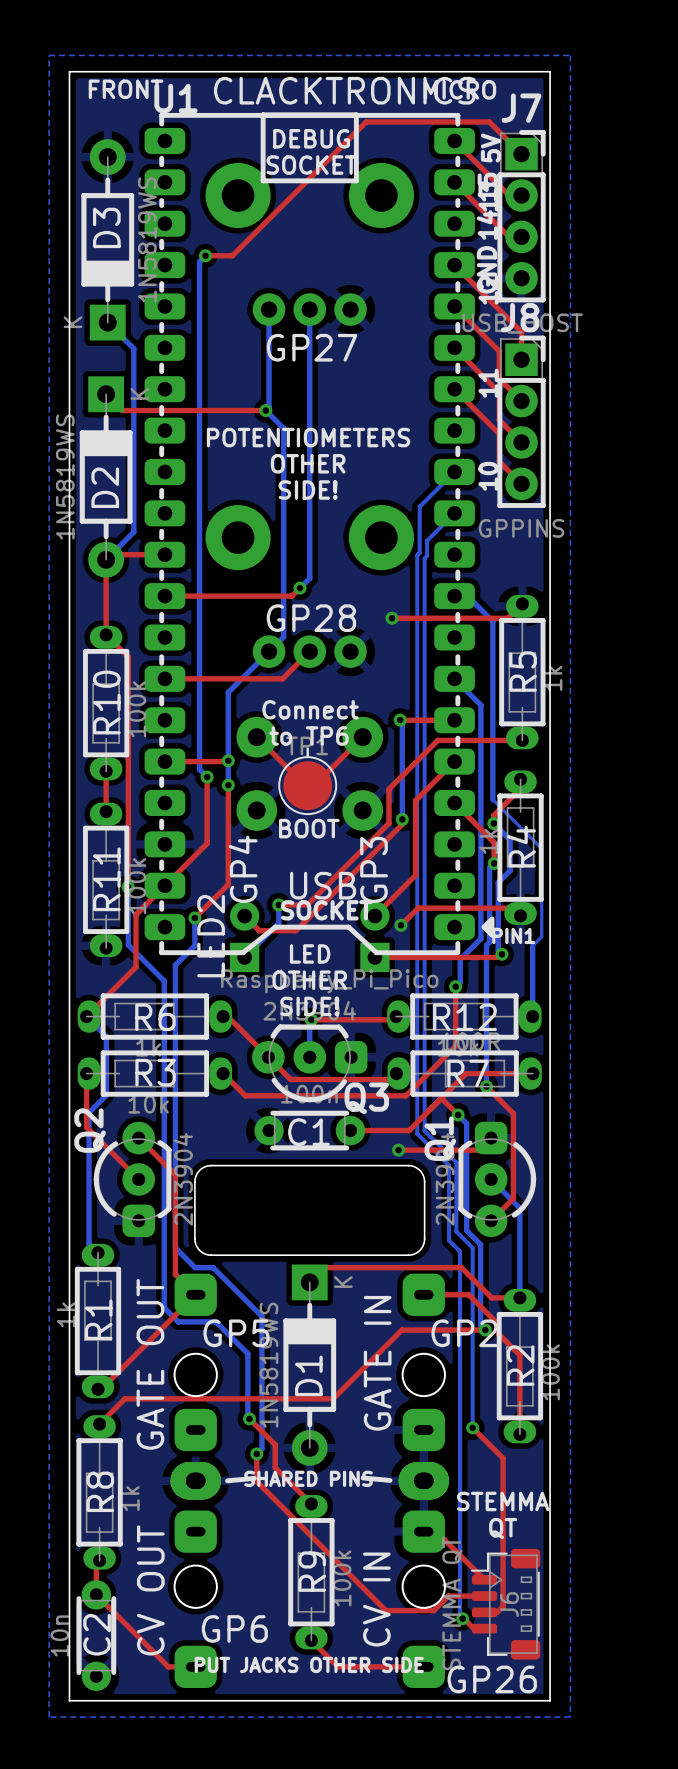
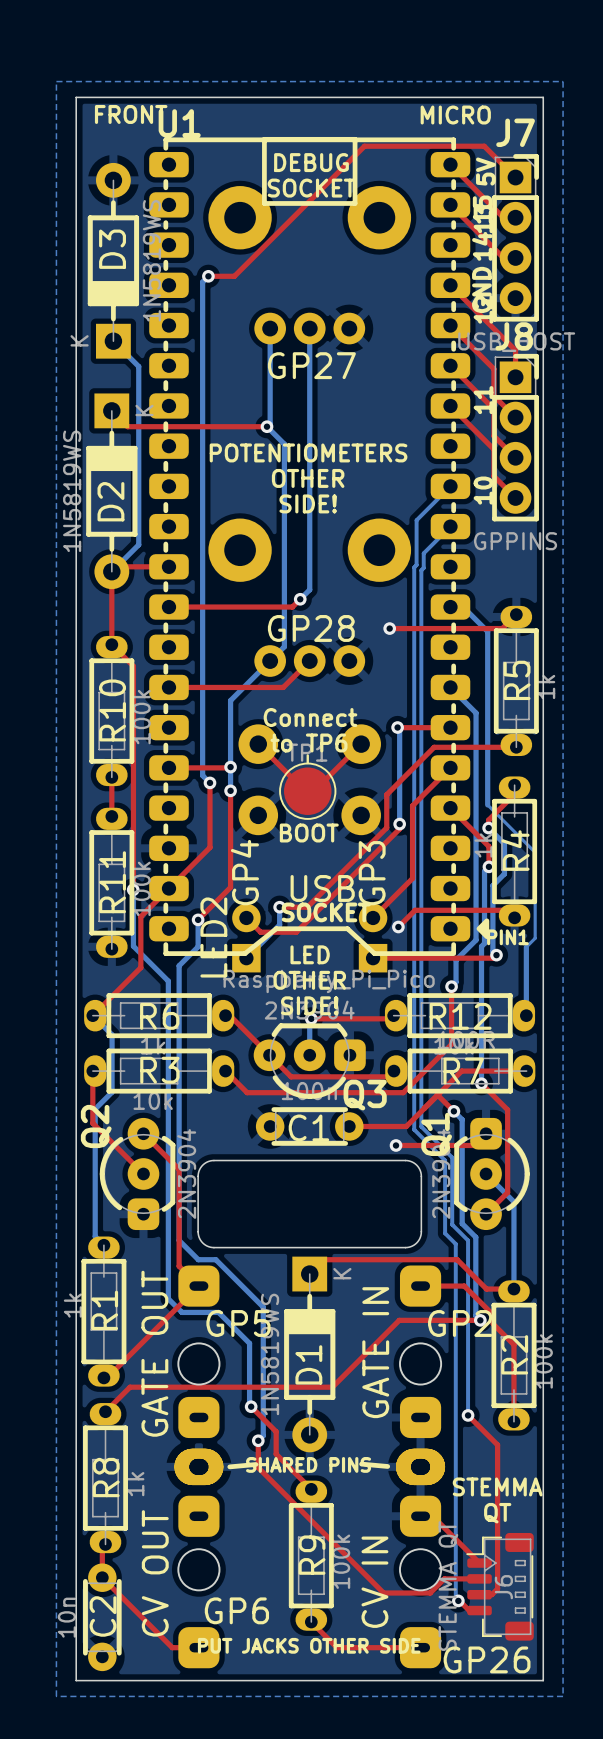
text: CLACKTRONICS (344, 90) -> none

